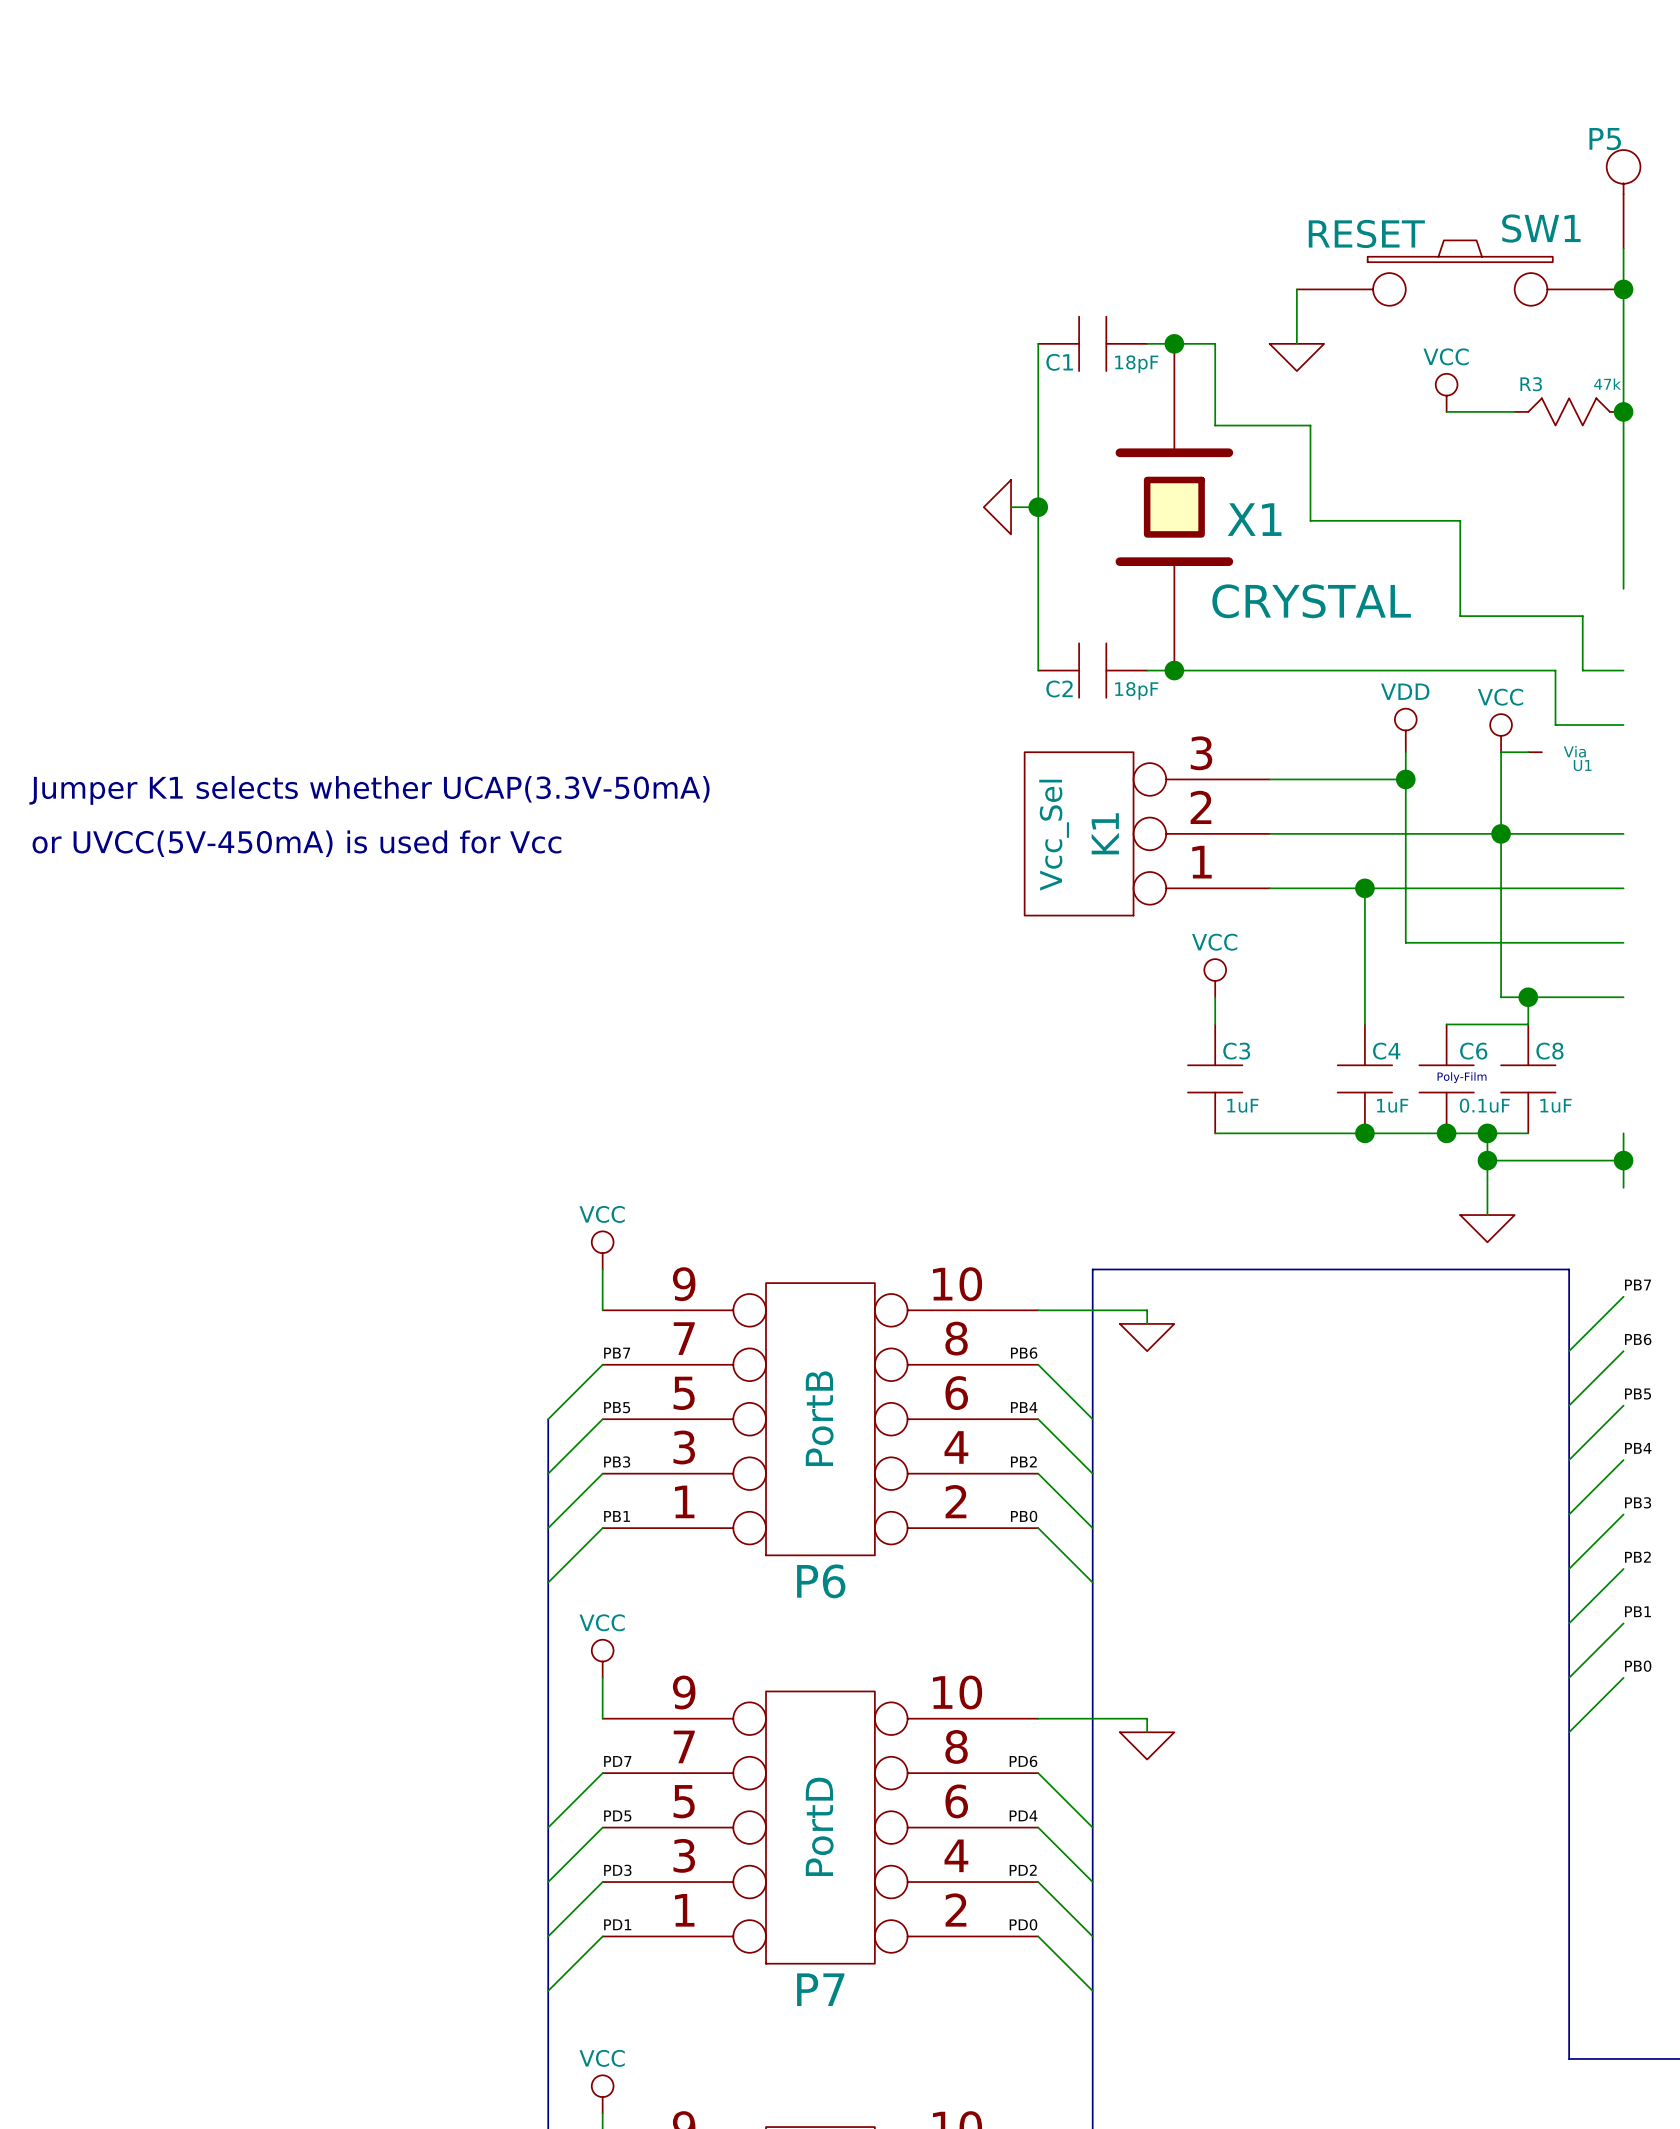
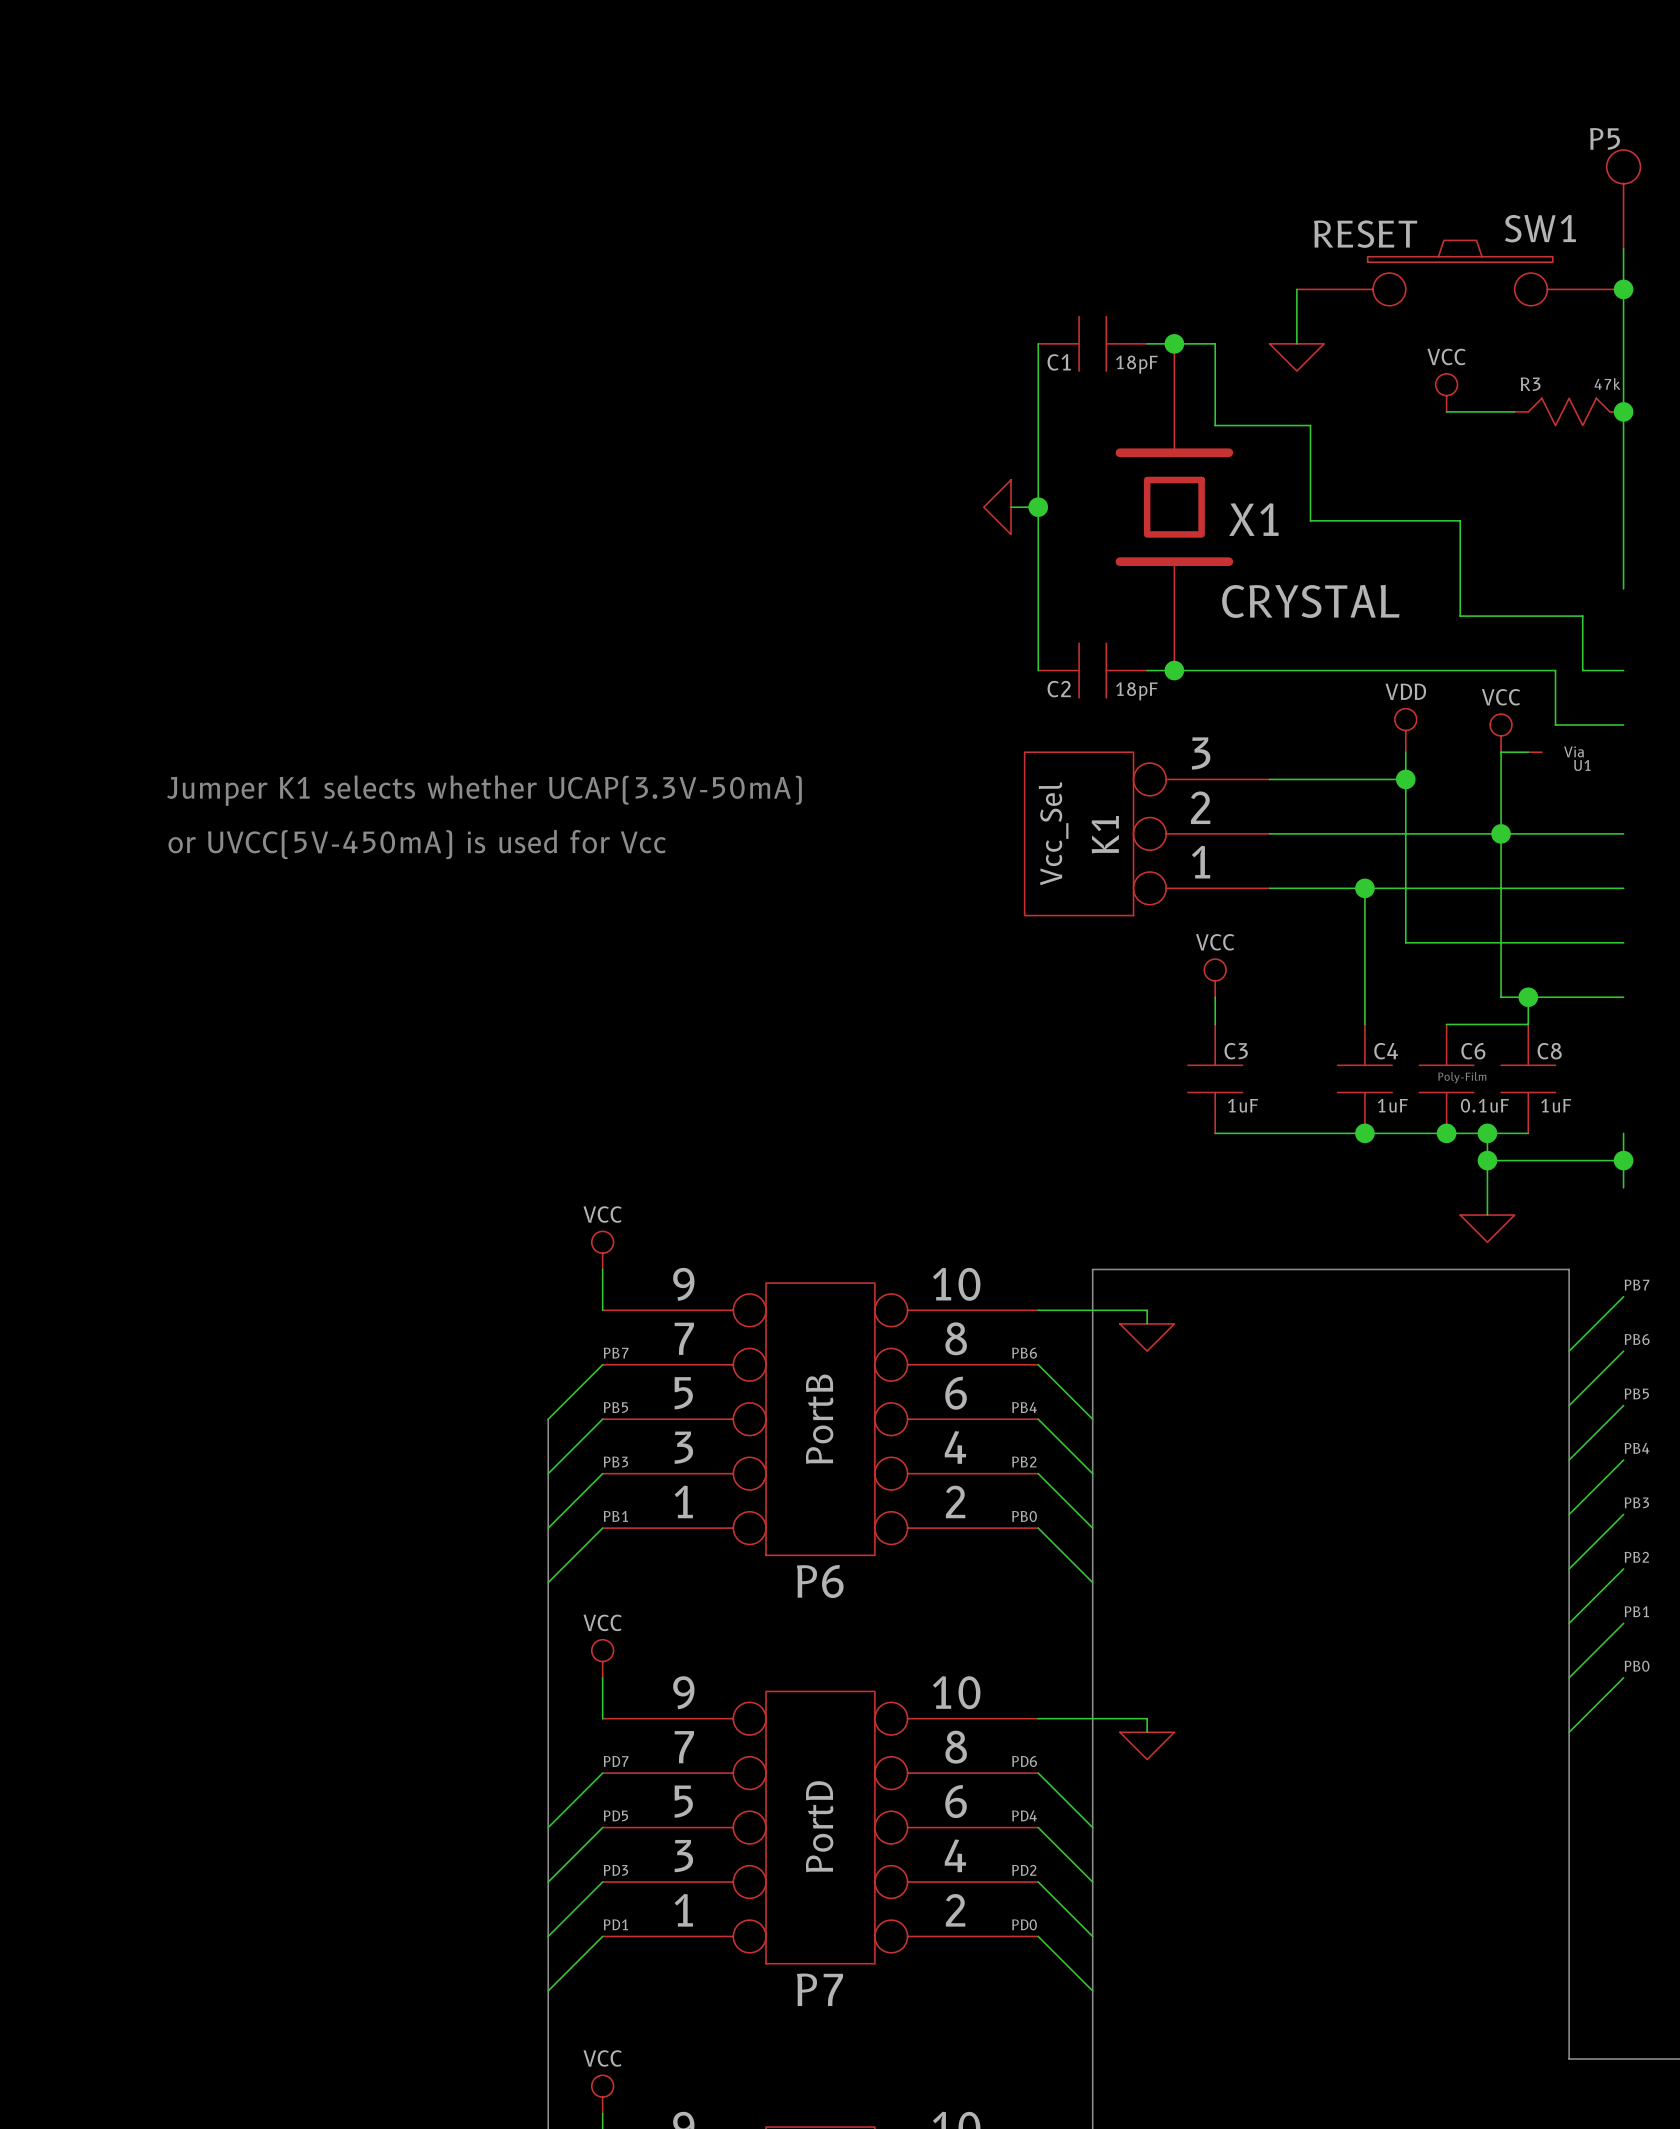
text position: Jumper K1 selects whether UCAP(3.3V-50mA) (369, 790) -> Jumper K1 selects whether UCAP(3.3V-50mA) (484, 790)
text position: or UVCC(5V-450mA) is used for Vcc (296, 843) -> or UVCC(5V-450mA) is used for Vcc (417, 844)

